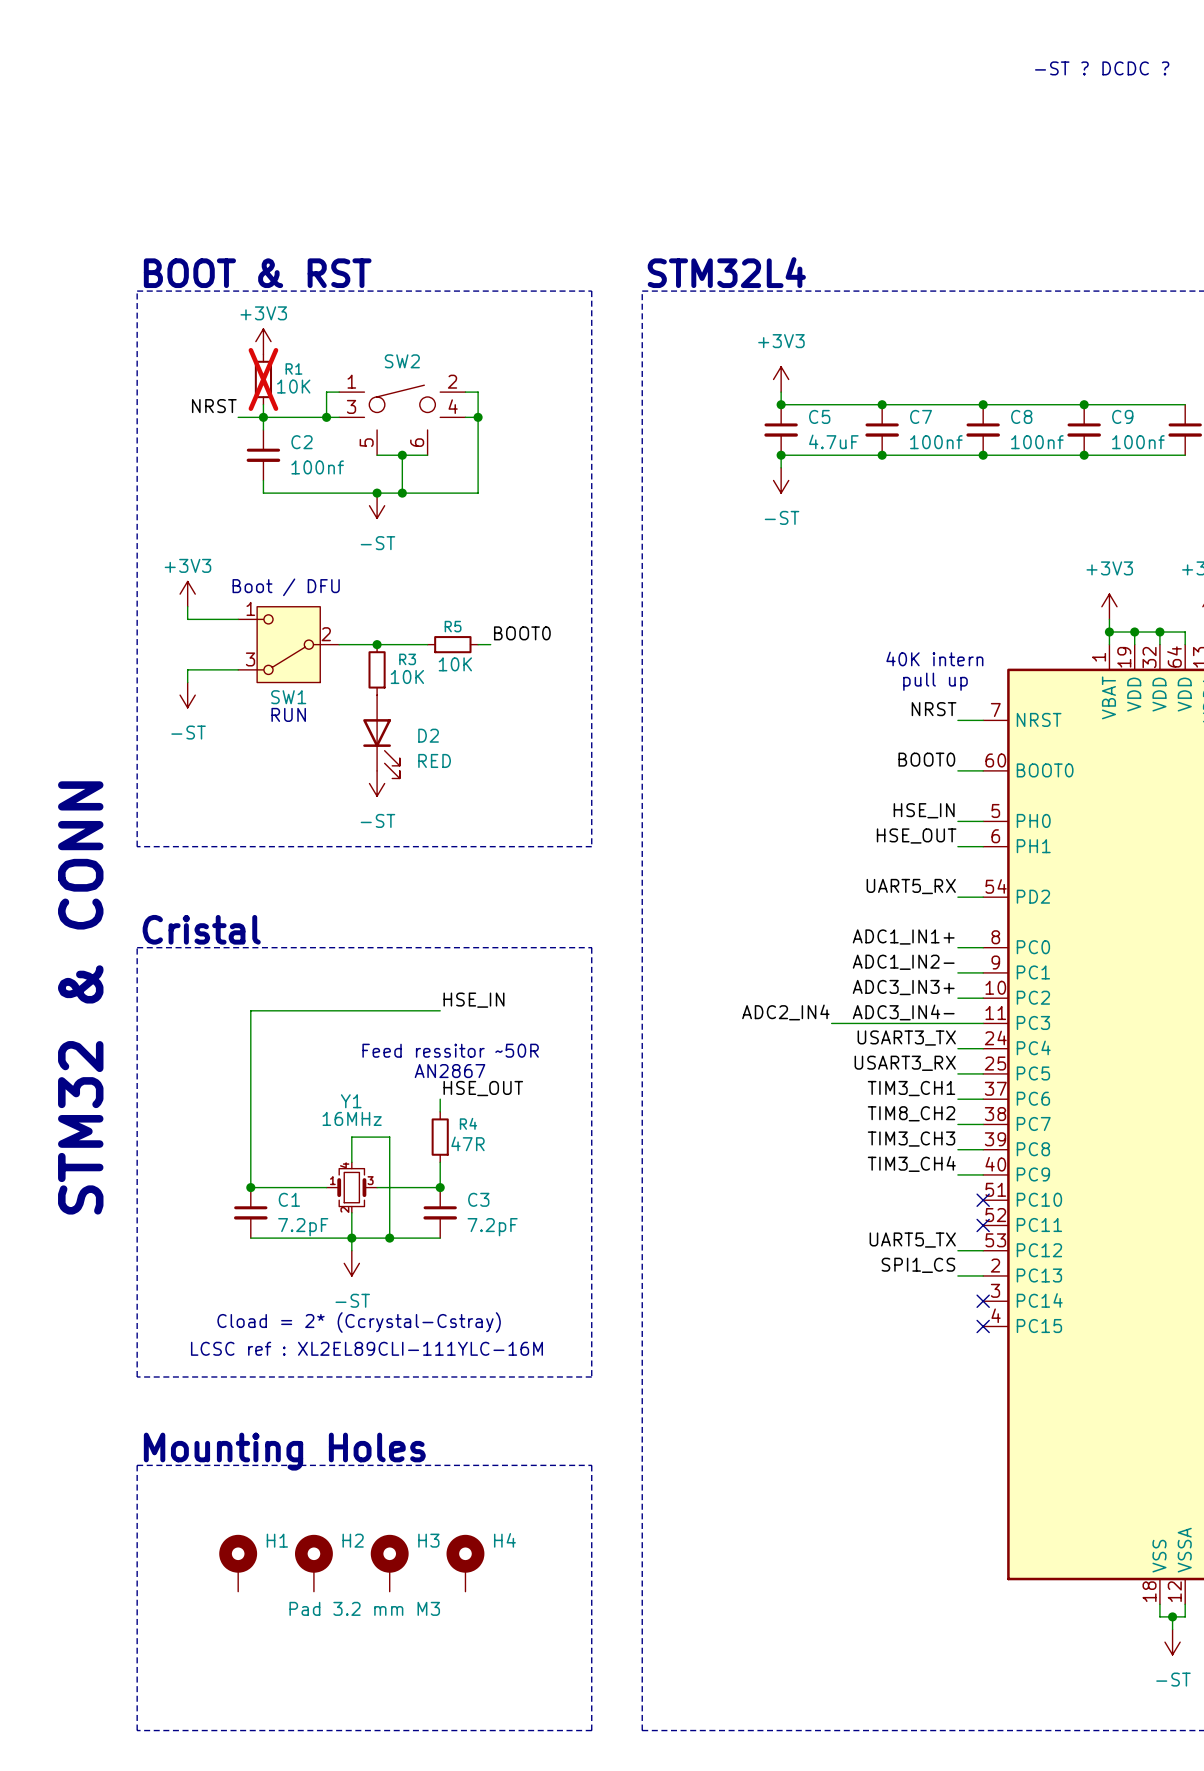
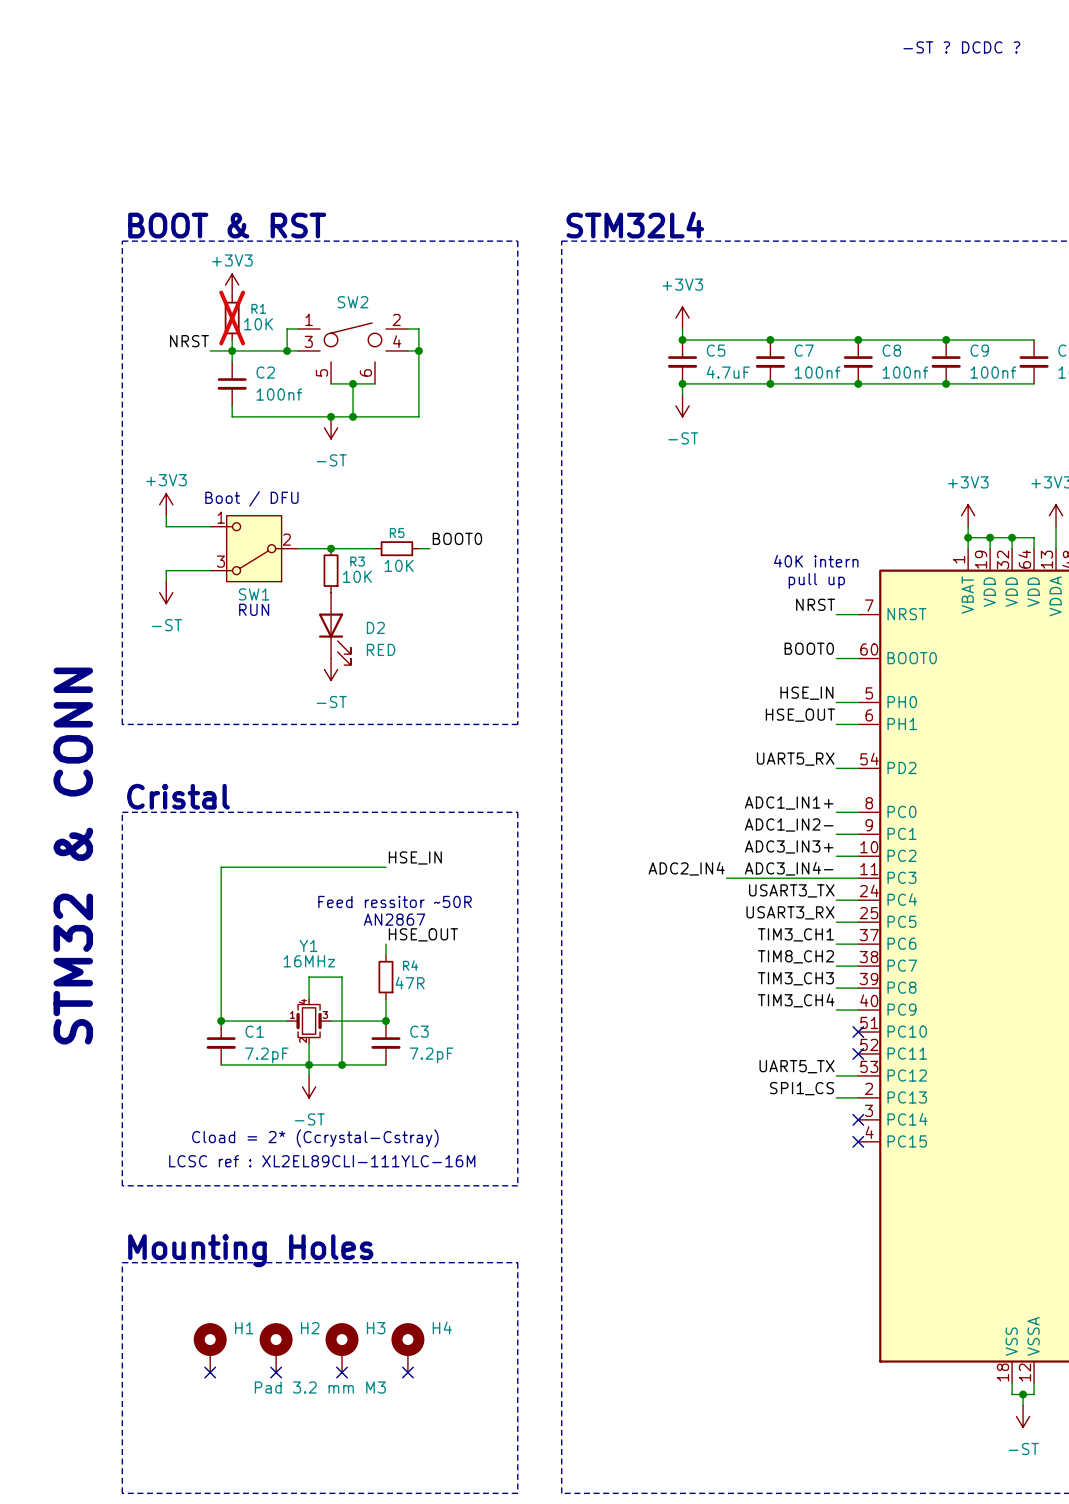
no-connect mark: none -> (210, 1372)
no-connect mark: none -> (276, 1372)
no-connect mark: none -> (342, 1372)
no-connect mark: none -> (407, 1372)

